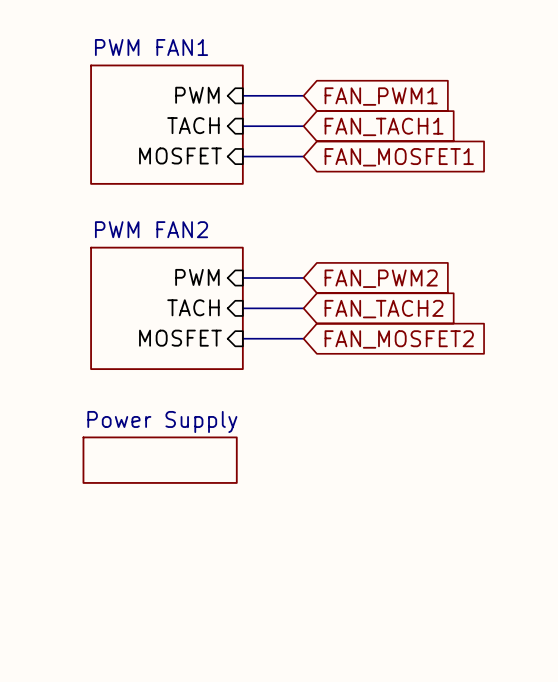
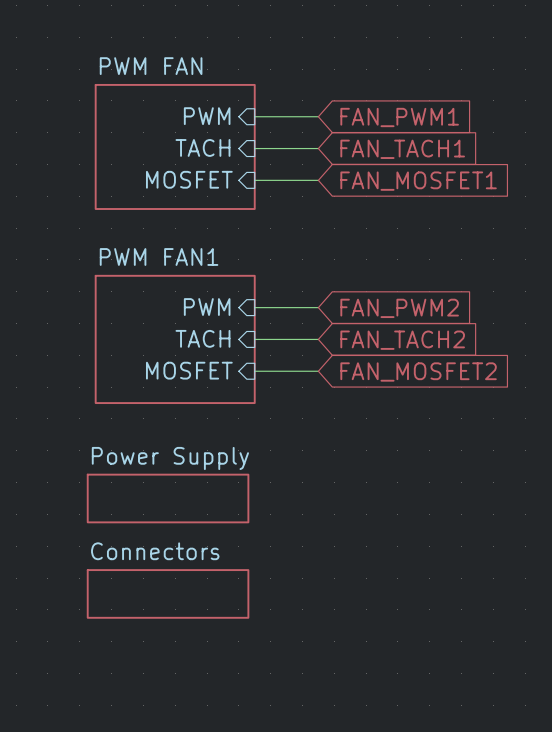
sheet PWM FAN1 name: PWM FAN1 (151, 47) -> PWM FAN (151, 66)
sheet PWM FAN2 name: PWM FAN2 (151, 229) -> PWM FAN1 (159, 256)
sheet Connectors: none -> (168, 593)

